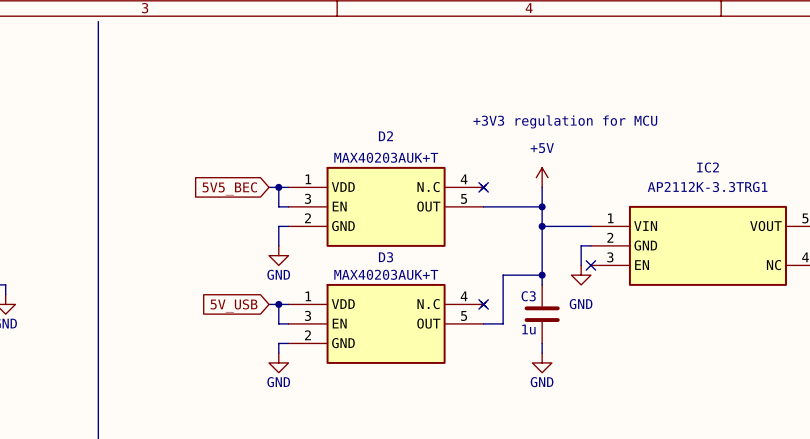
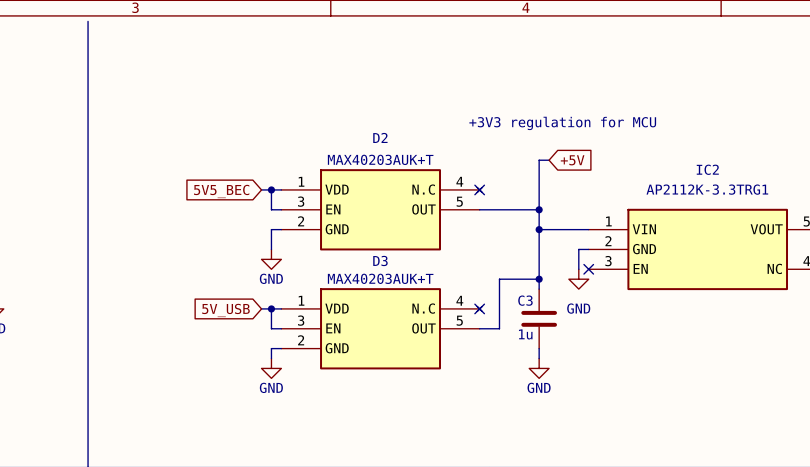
wire: none -> (549, 160) (539, 160) (539, 189)
global label: none -> +5V (572, 160)
power symbol: +5V (542, 177) -> none

